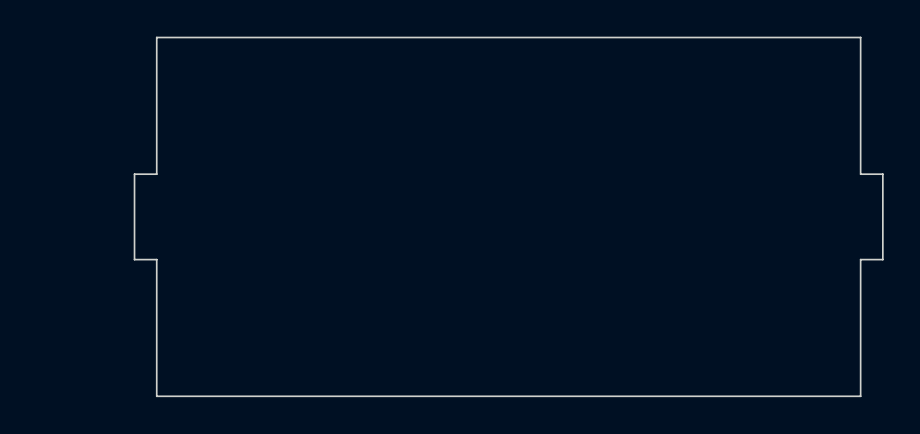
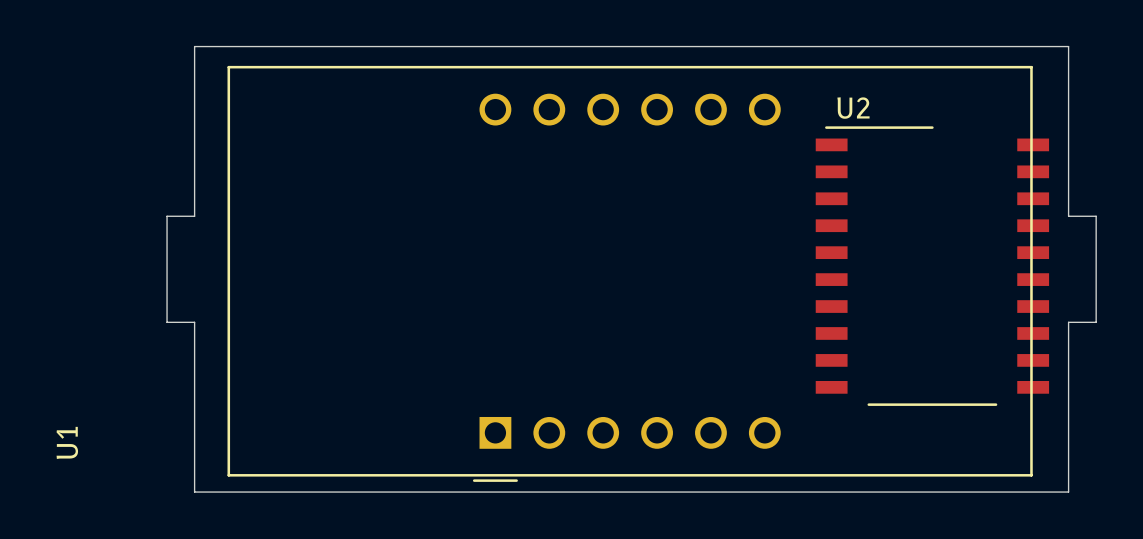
U2: none -> (932, 266)
U1: none -> (630, 273)

